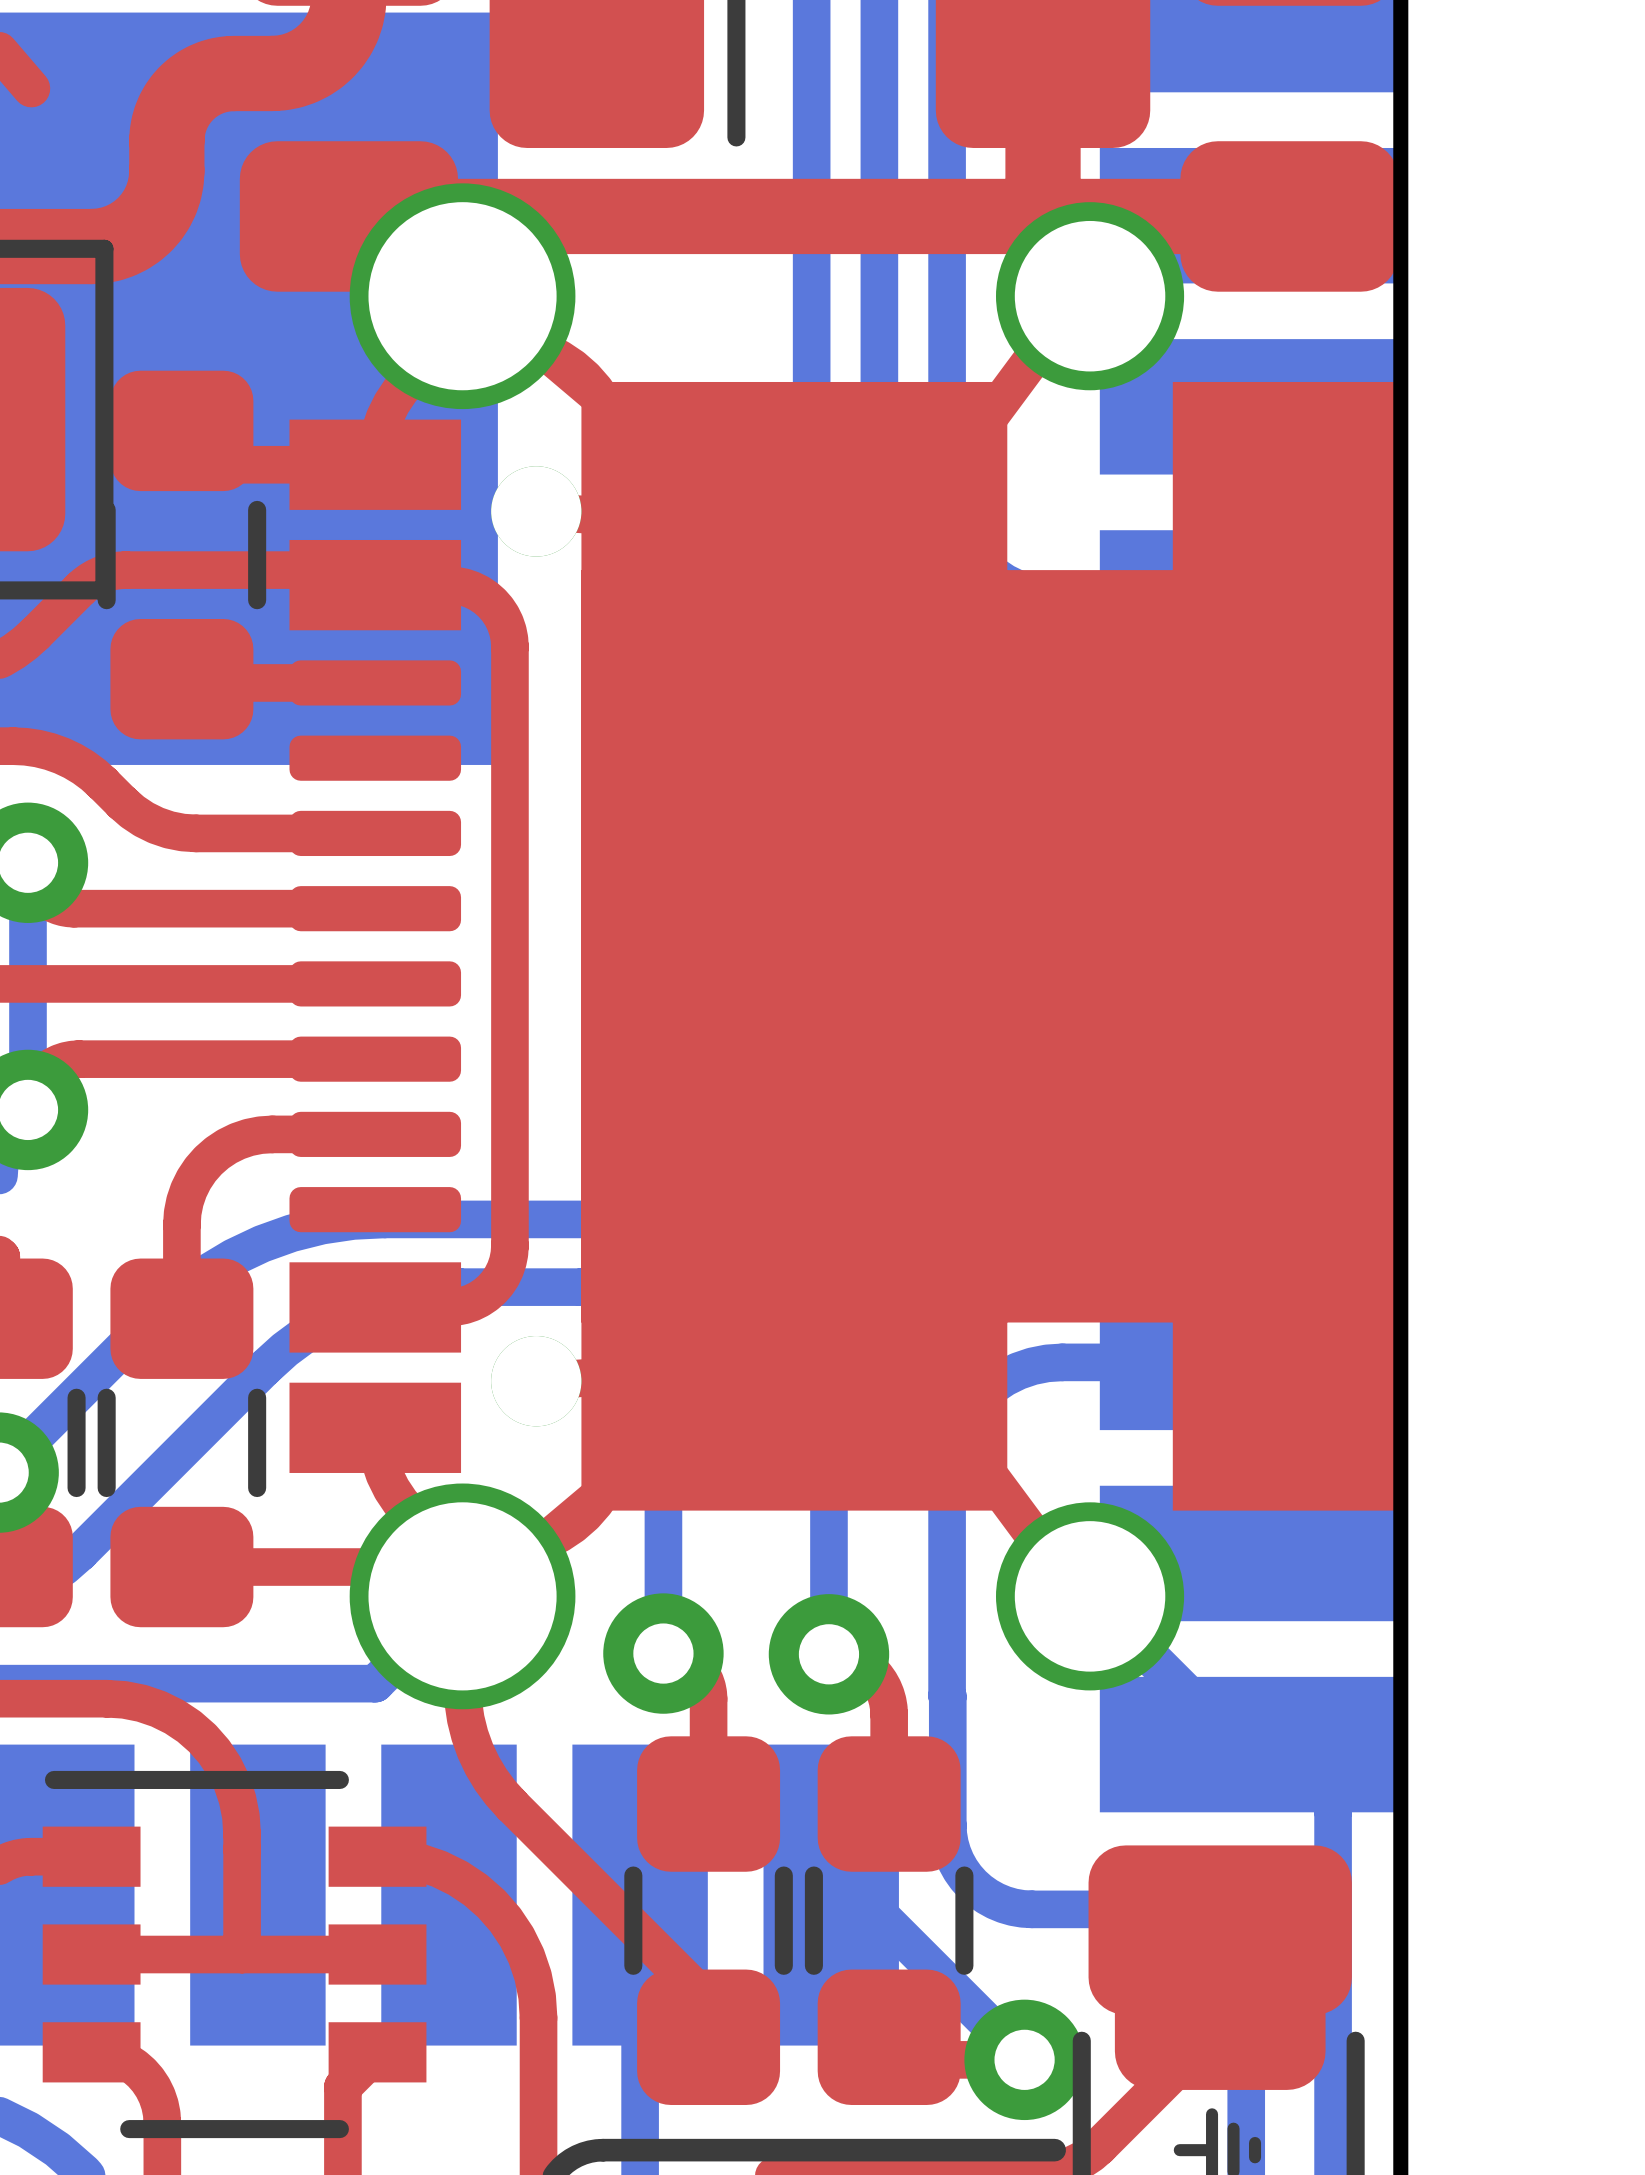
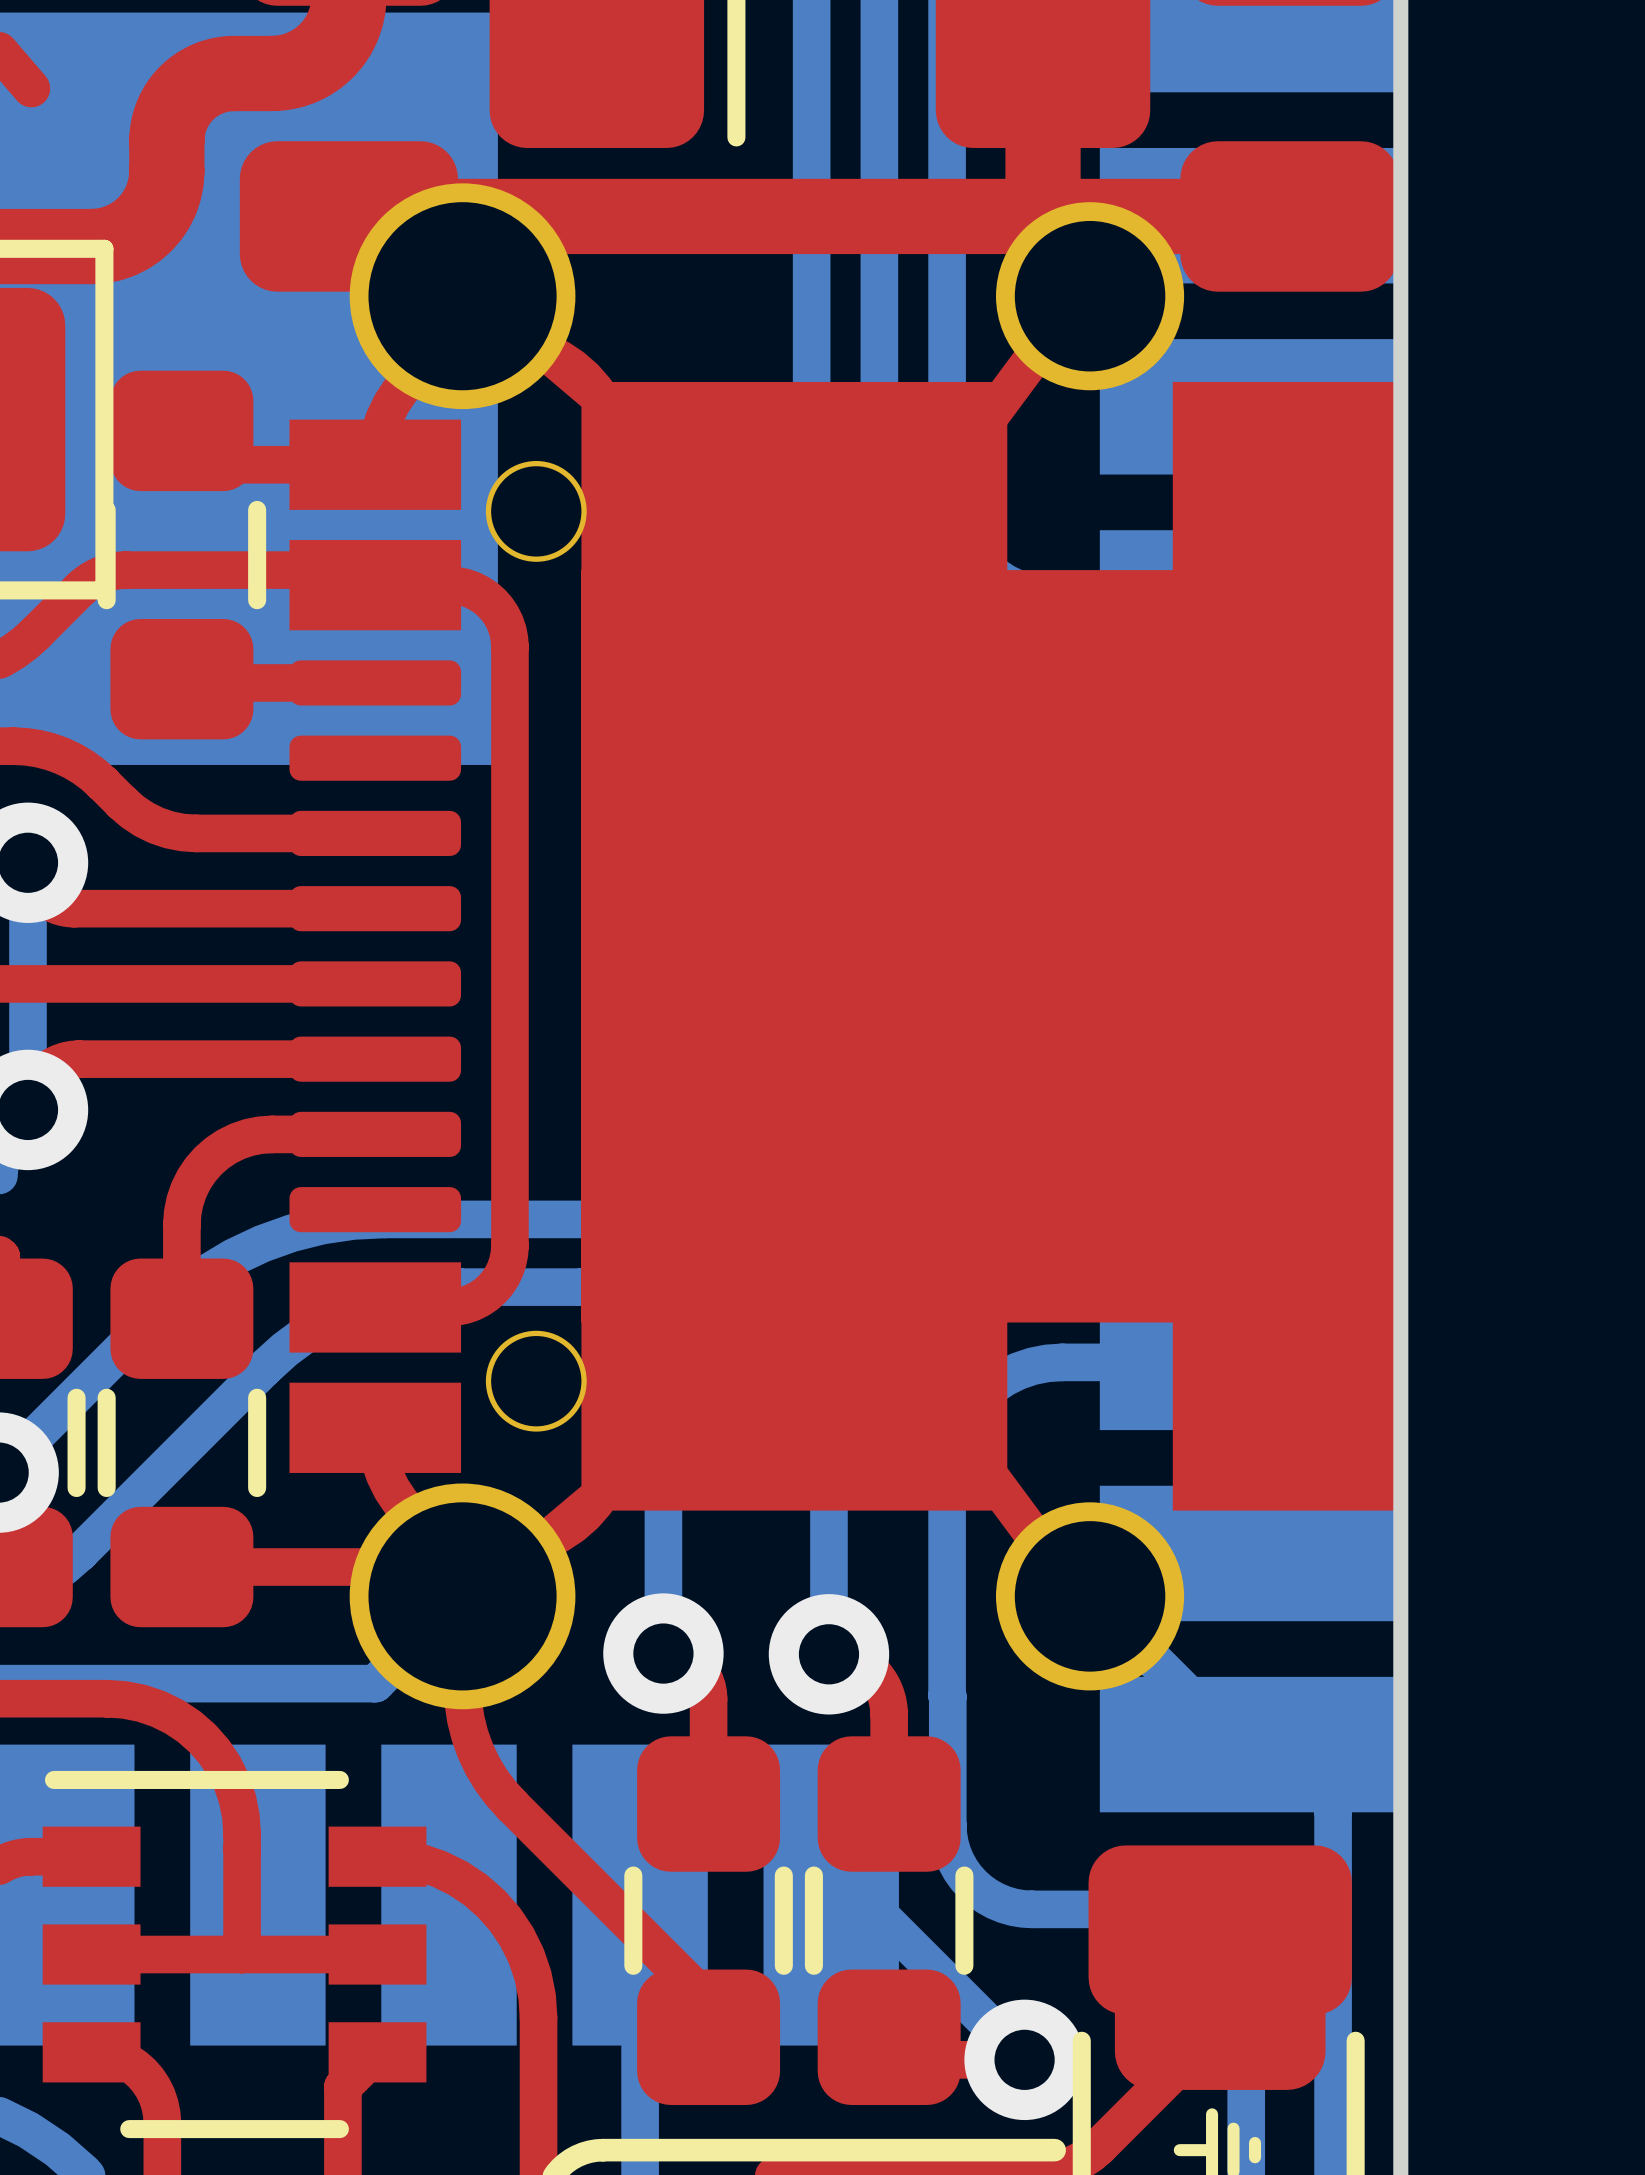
part footprint: [289, 183, 1408, 1710] -> [289, 183, 1408, 1710]

